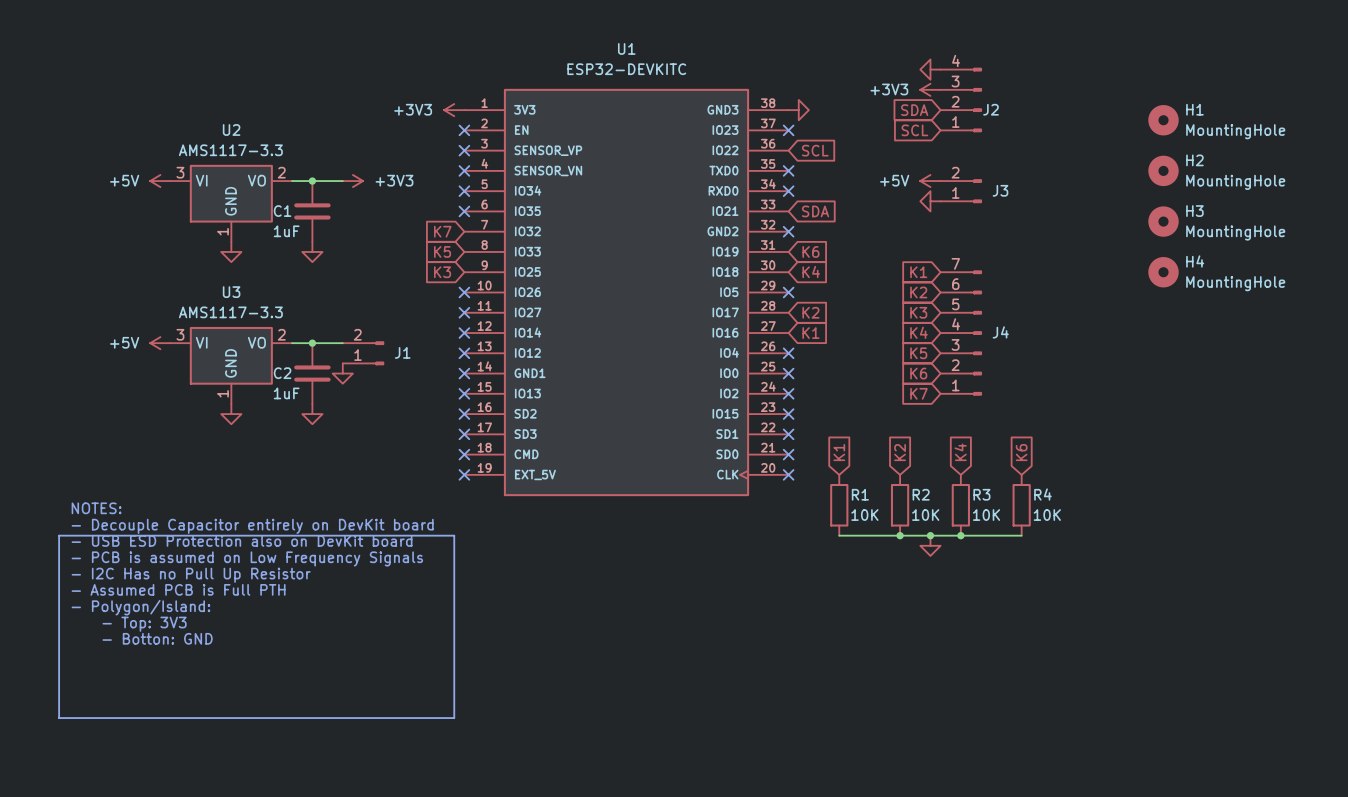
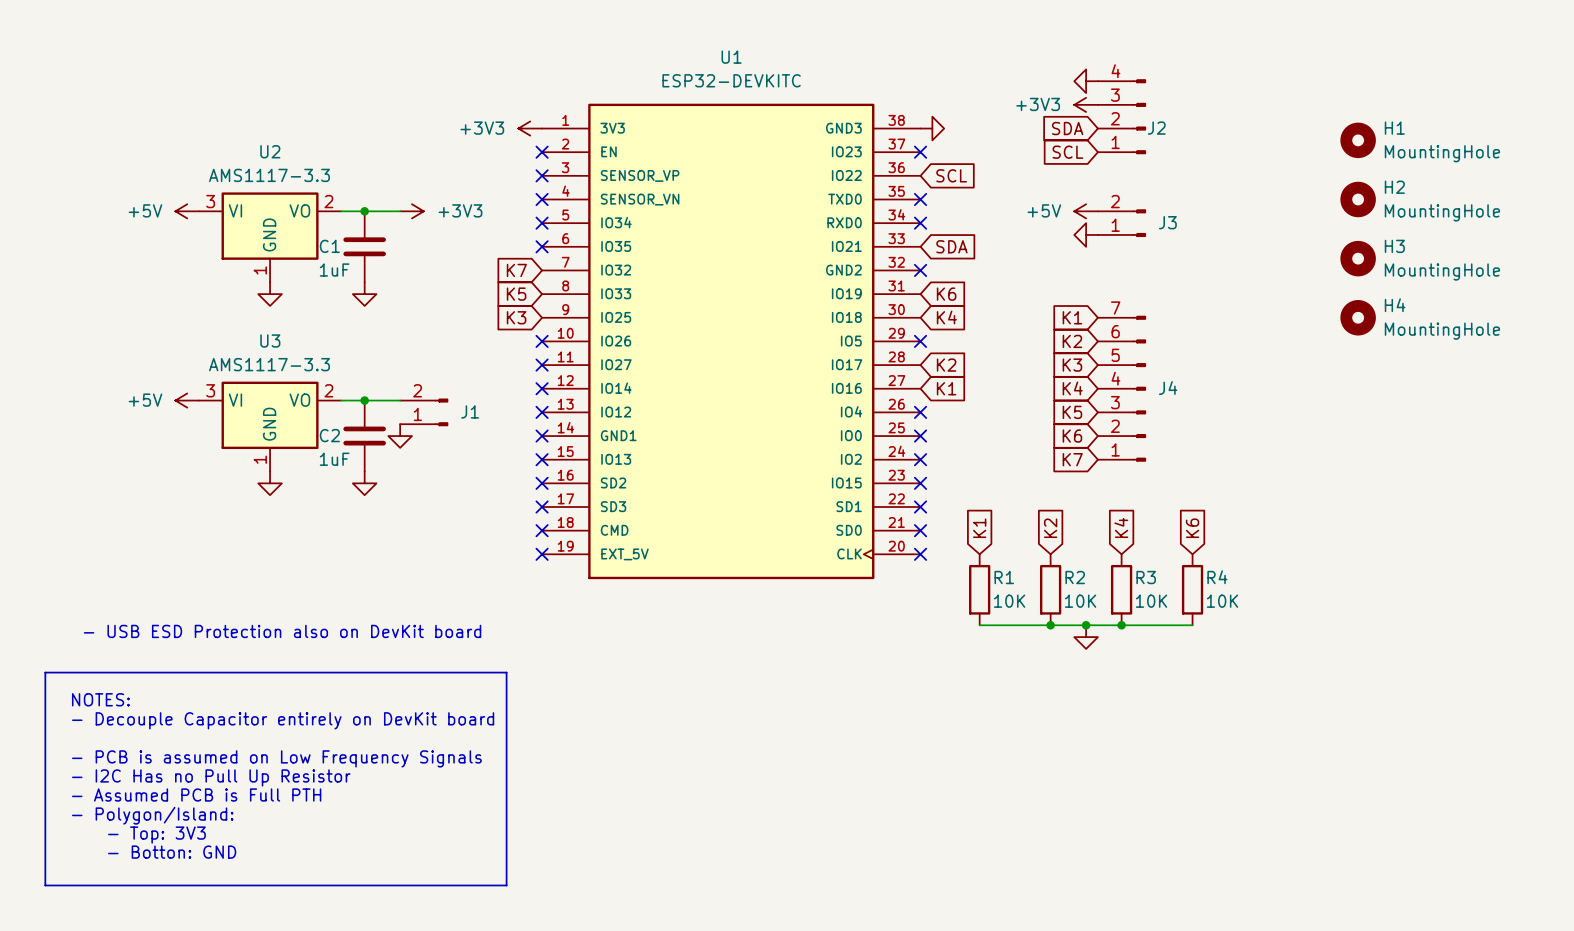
text position: NOTES: (96, 508) -> NOTES: (100, 699)
text position: - Decouple Capacitor entirely on DevKit board (252, 526) -> - Decouple Capacitor entirely on DevKit board (283, 720)
line: (59, 535) (454, 535) (454, 718) (59, 718) (59, 535) -> (45, 672) (506, 672) (506, 885) (45, 885) (45, 672)
text position: - PCB is assumed on Low Frequency Signals (247, 558) -> - PCB is assumed on Low Frequency Signals (276, 758)
text position: - I2C Has no Pull Up Resistor (191, 575) -> - I2C Has no Pull Up Resistor (211, 777)
text position: - Assumed PCB is Full PTH (178, 589) -> - Assumed PCB is Full PTH (196, 795)
text position: - Polygon/Island: (140, 607) -> - Polygon/Island: (152, 815)
text position: - Top: 3V3 (144, 624) -> - Top: 3V3 (156, 835)
text position: - Botton: GND (157, 638) -> - Botton: GND (172, 852)

